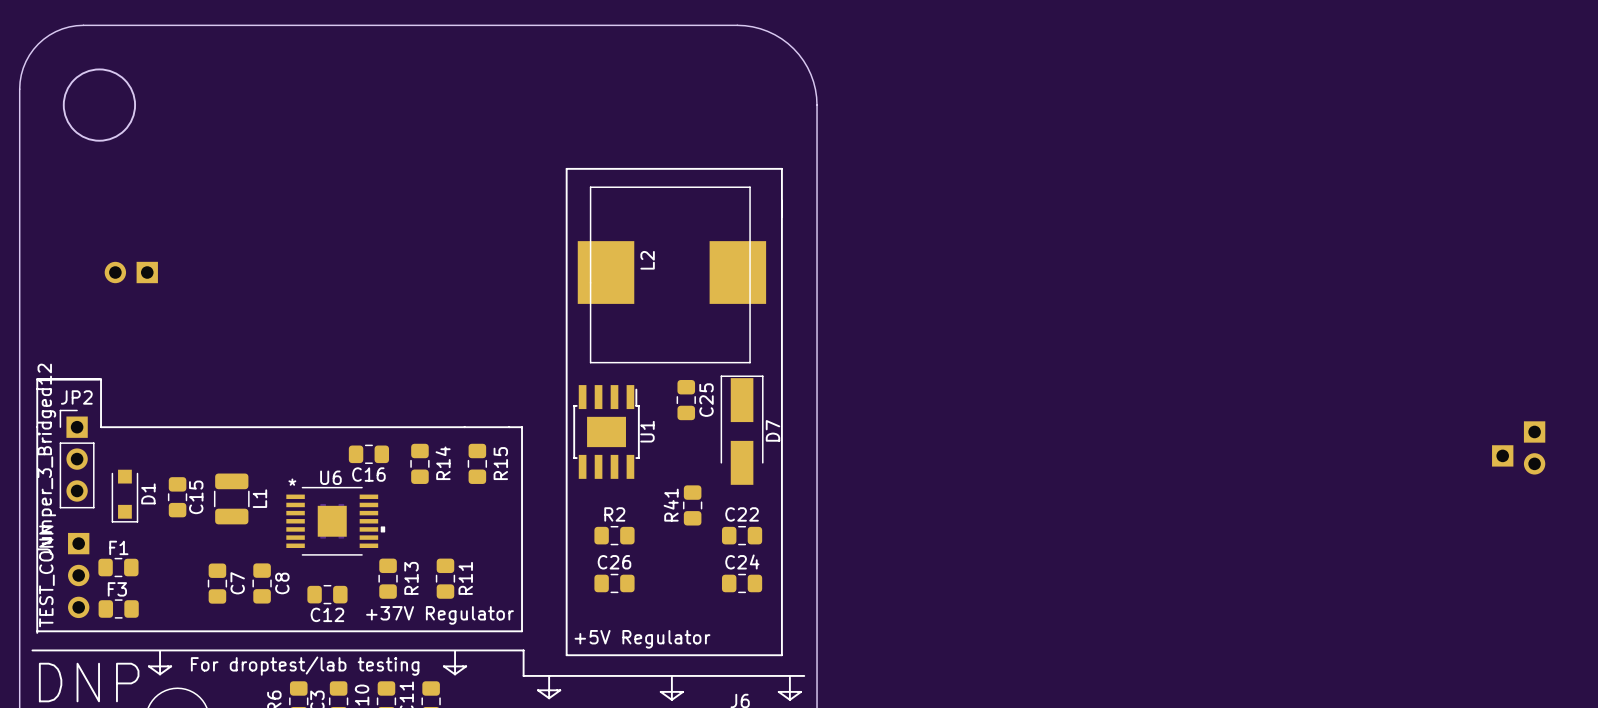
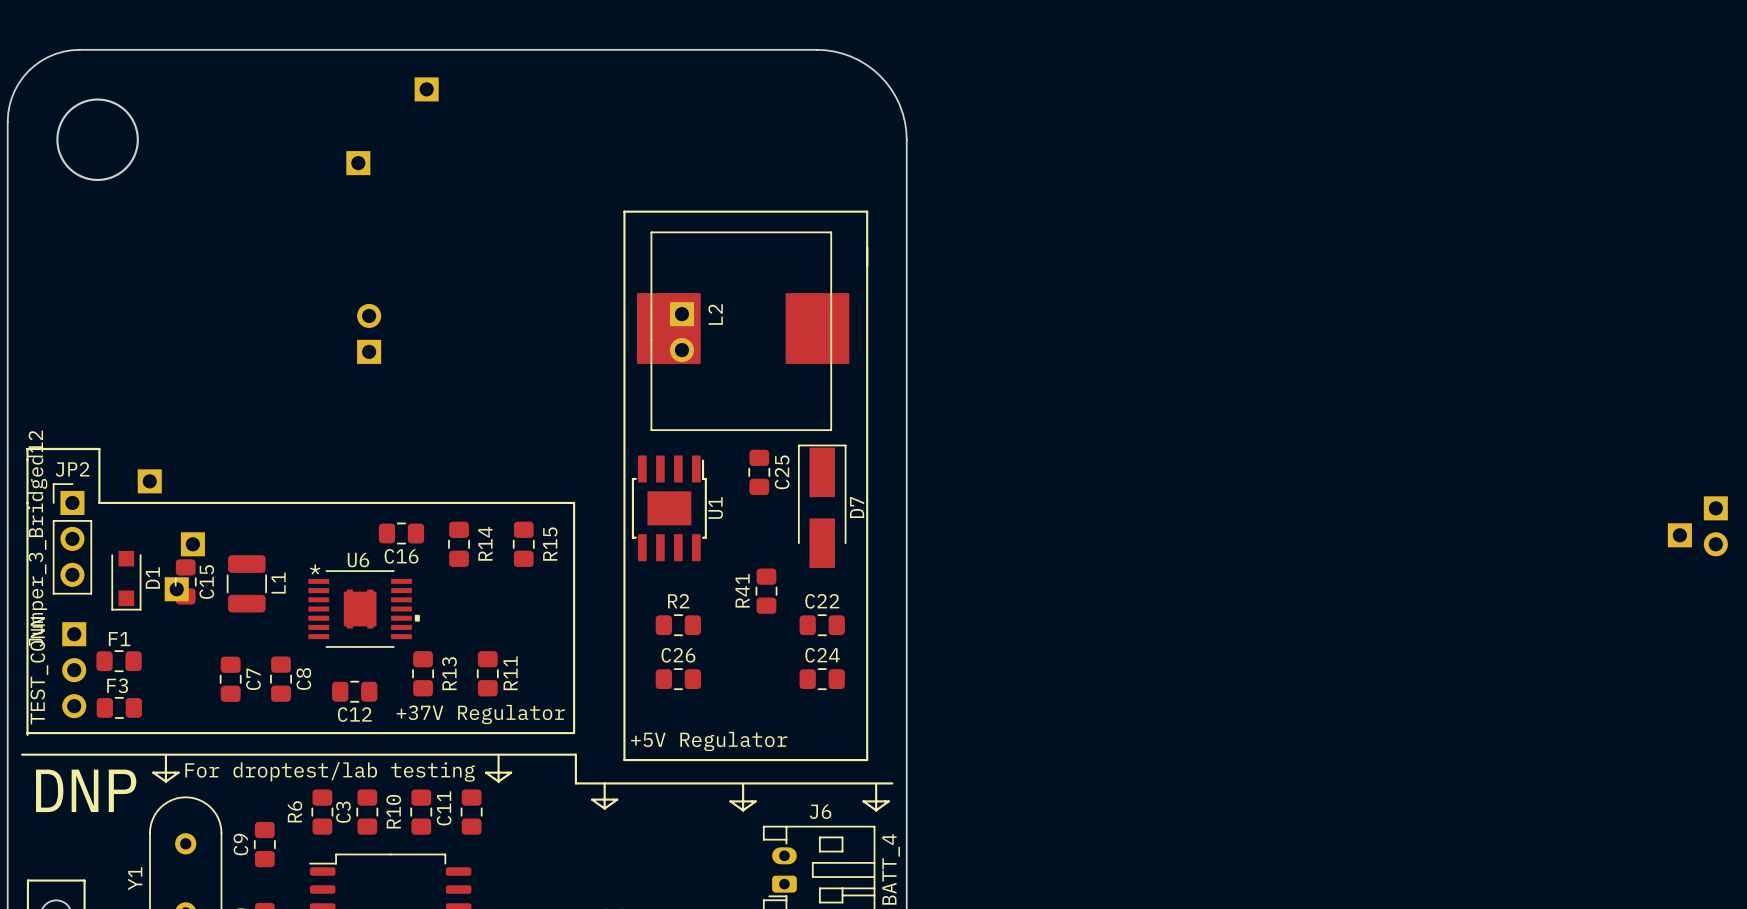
part: none -> (426, 89)
part: none -> (358, 163)
part rotation: 0° (131, 272) -> 90° clockwise (369, 333)
part position: (131, 272) -> (369, 333)
part: none -> (681, 332)
part: none -> (149, 481)
part: none -> (192, 544)
part: none -> (176, 589)

